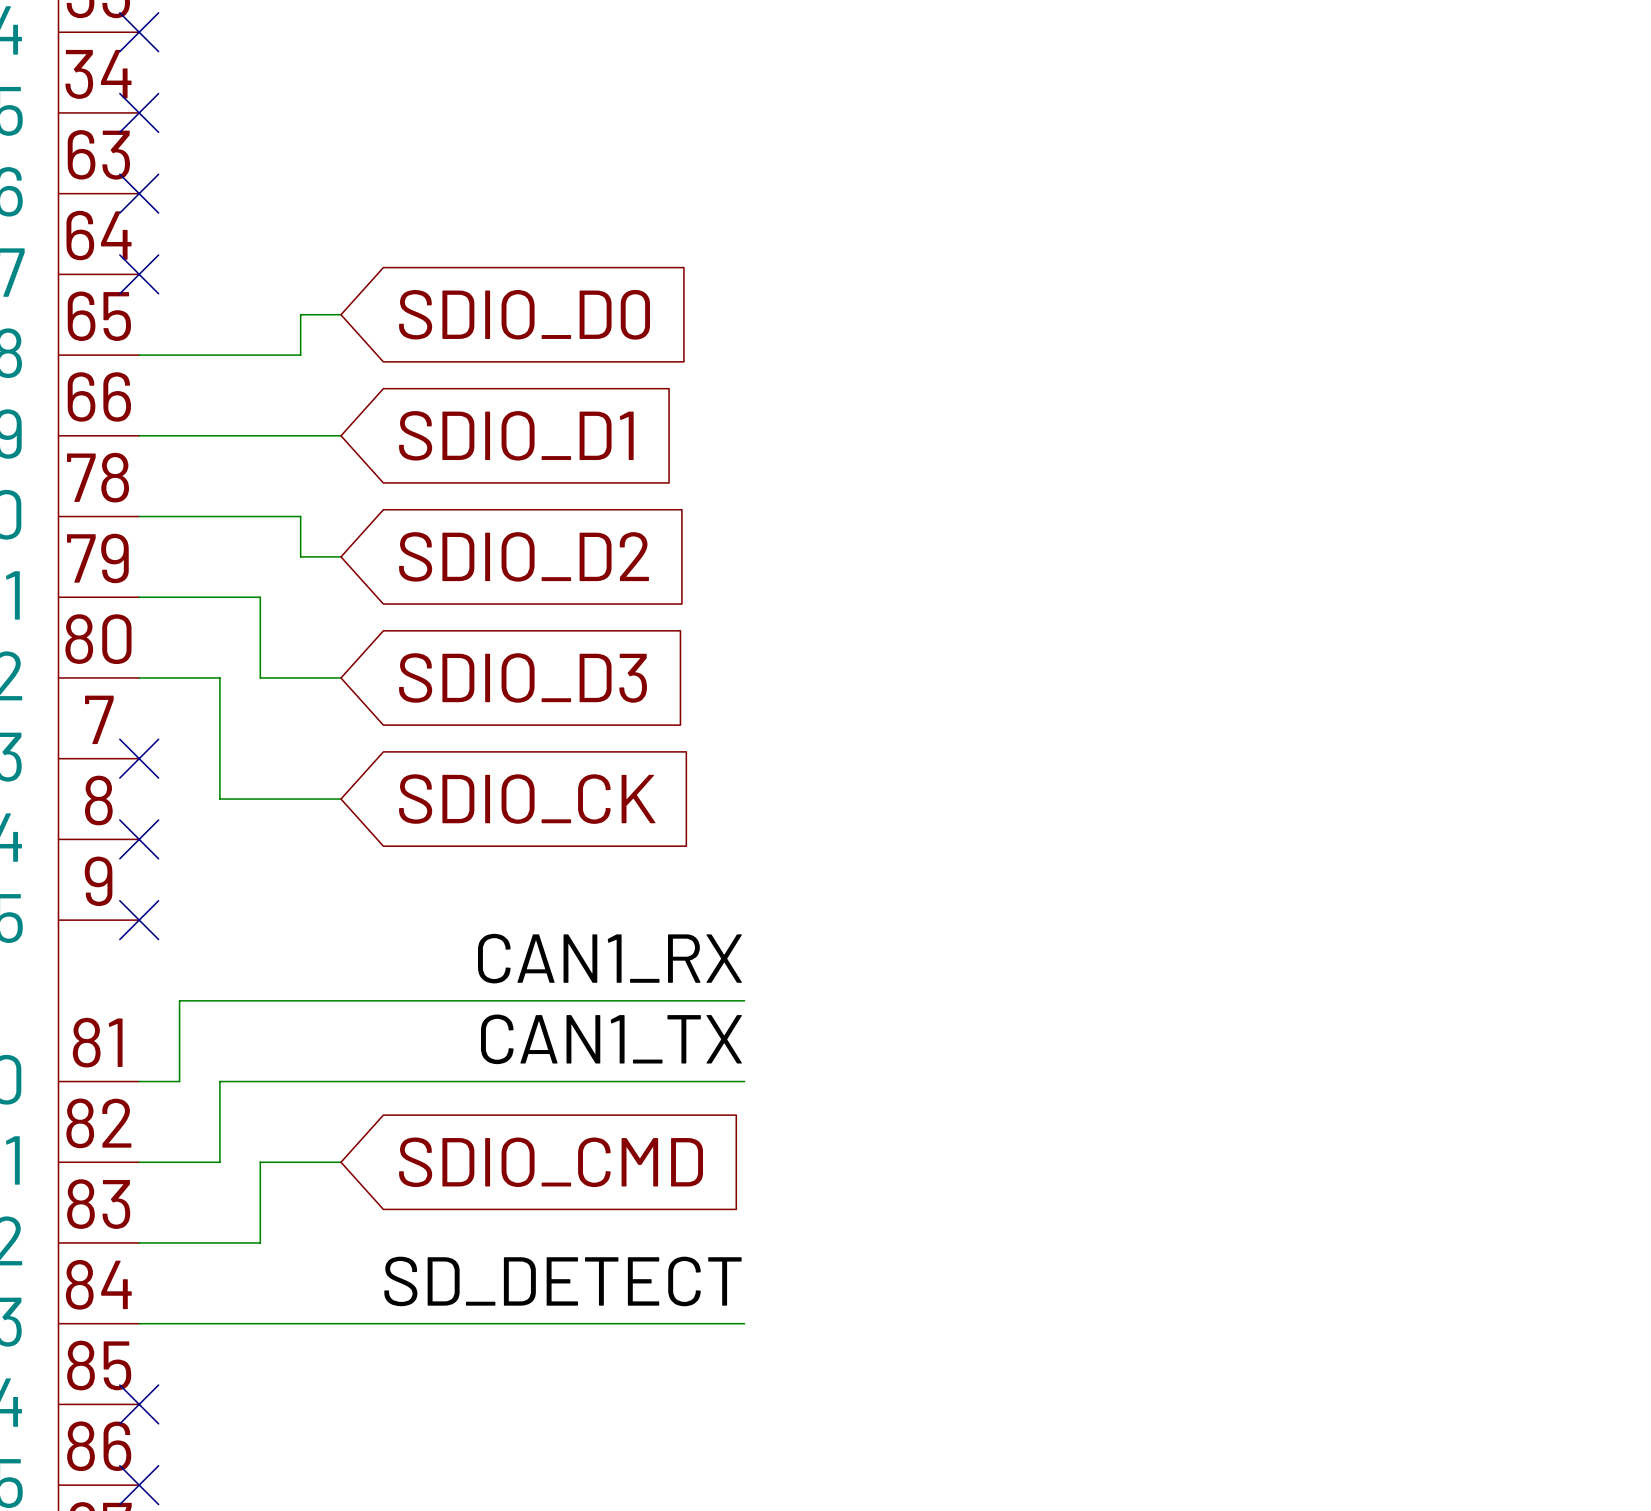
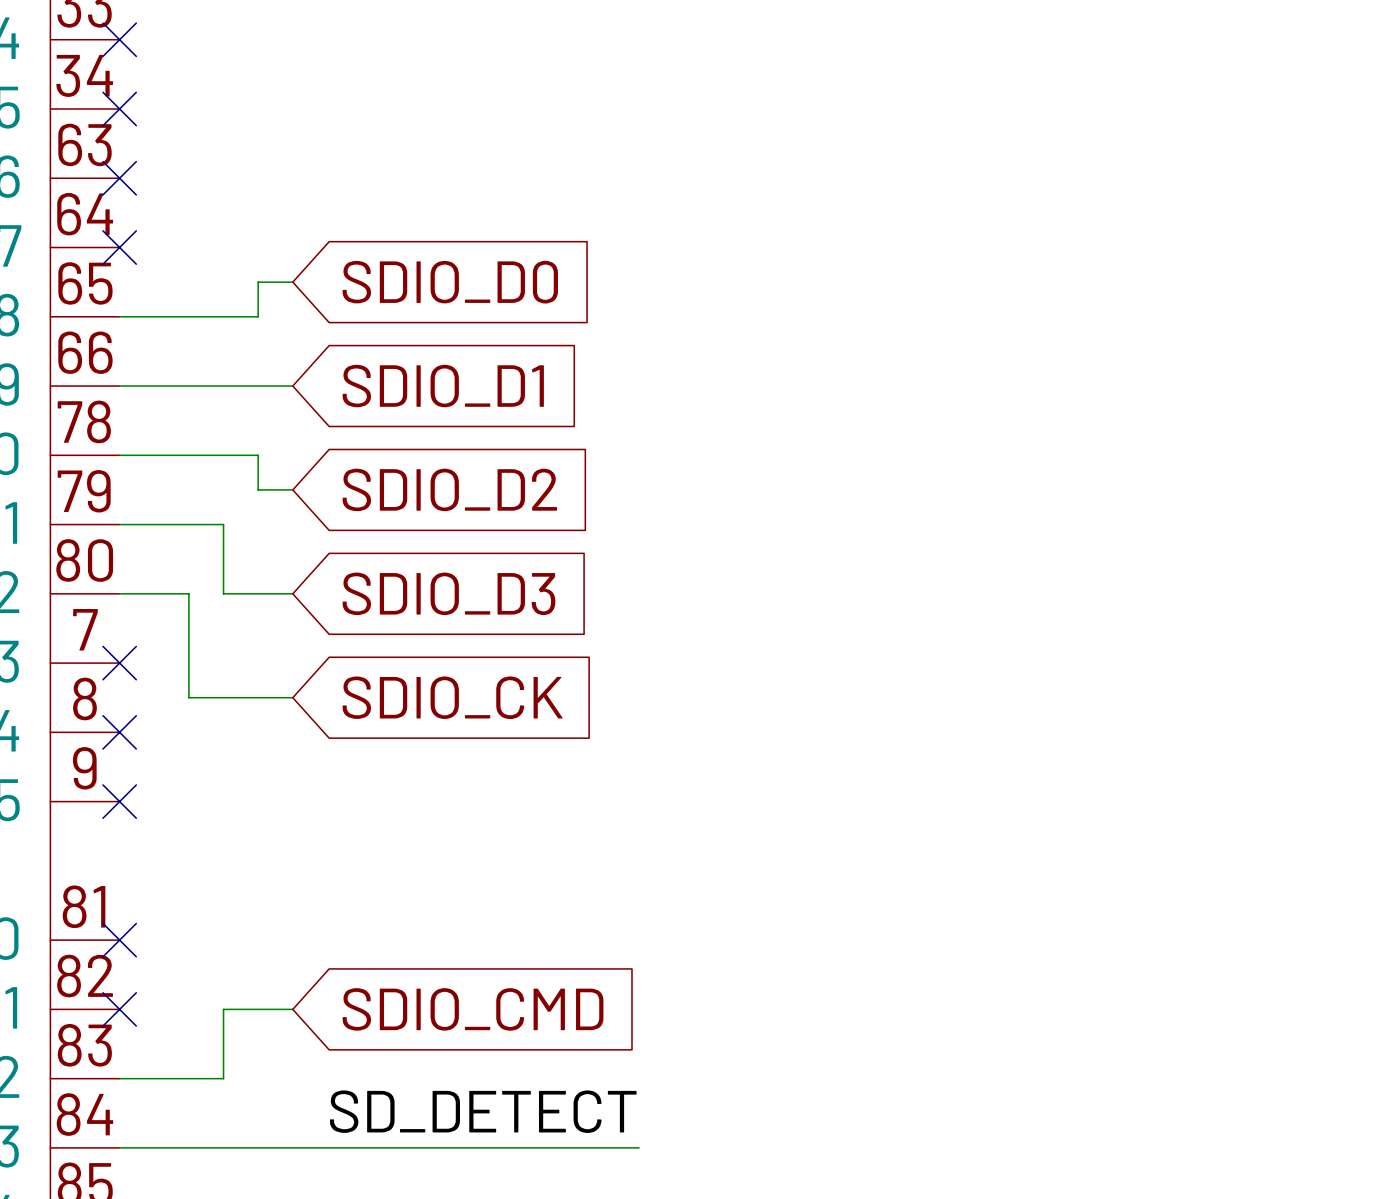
label: CAN1_RX (609, 958) -> none
wire: (744, 1000) (179, 1000) (179, 1081) (139, 1081) -> none
label: CAN1_TX (611, 1039) -> none
no-connect mark: none -> (119, 940)
wire: (744, 1081) (219, 1081) (219, 1162) (139, 1162) -> none
no-connect mark: none -> (119, 1009)

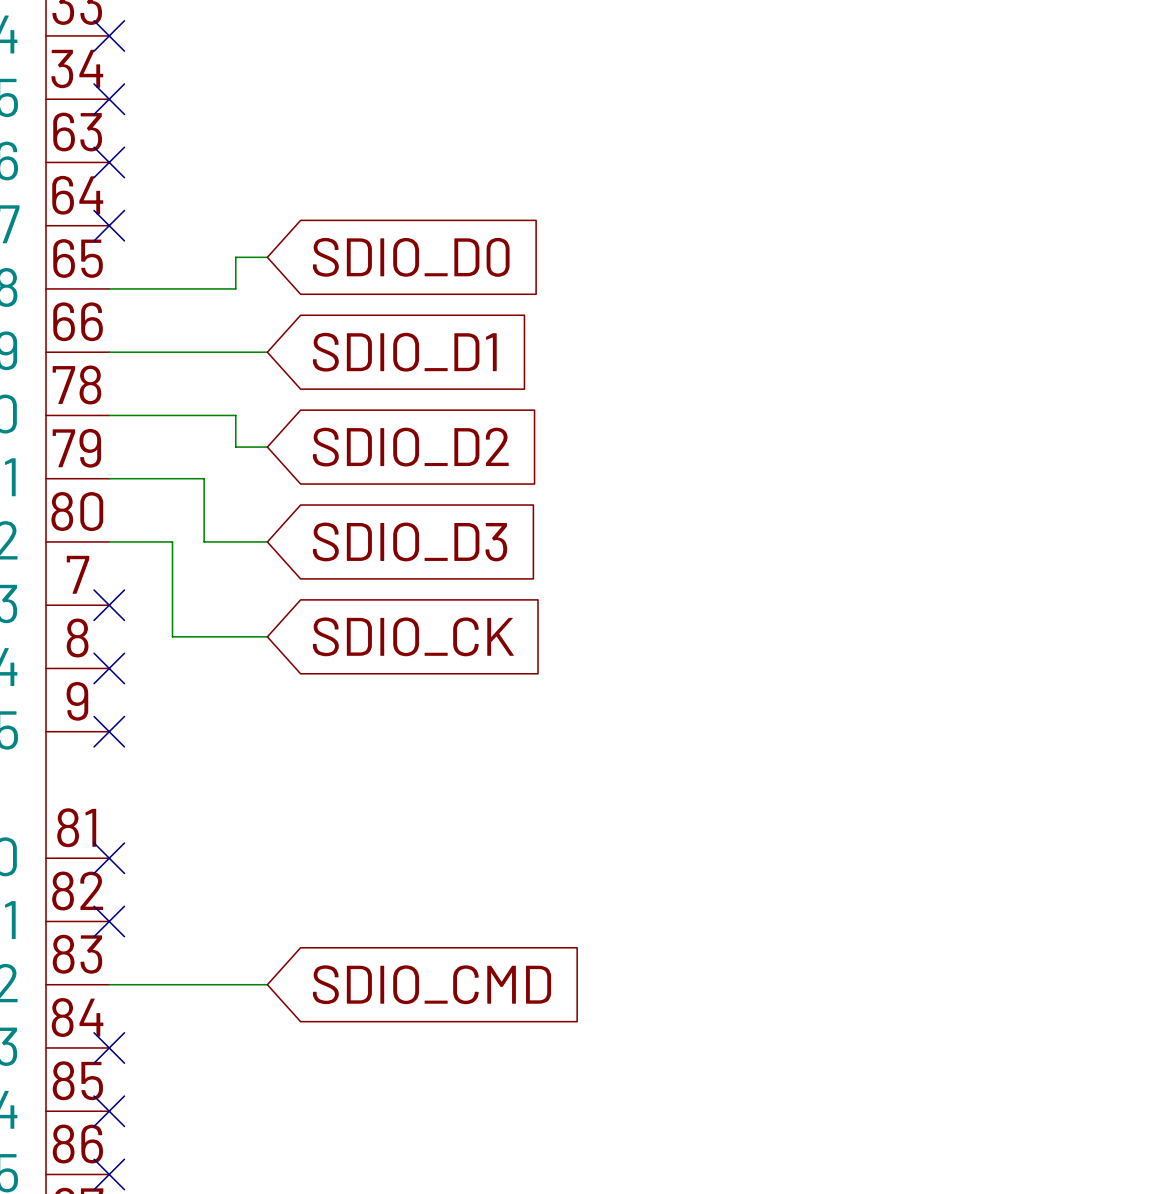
wire: (292, 1009) (223, 1009) (223, 1078) -> (267, 984) (204, 984)
global label position: SDIO_CMD (473, 1009) -> SDIO_CMD (431, 984)
label: SD_DETECT (483, 1111) -> none
wire: (119, 1147) (639, 1147) -> none
no-connect mark: none -> (109, 1047)

